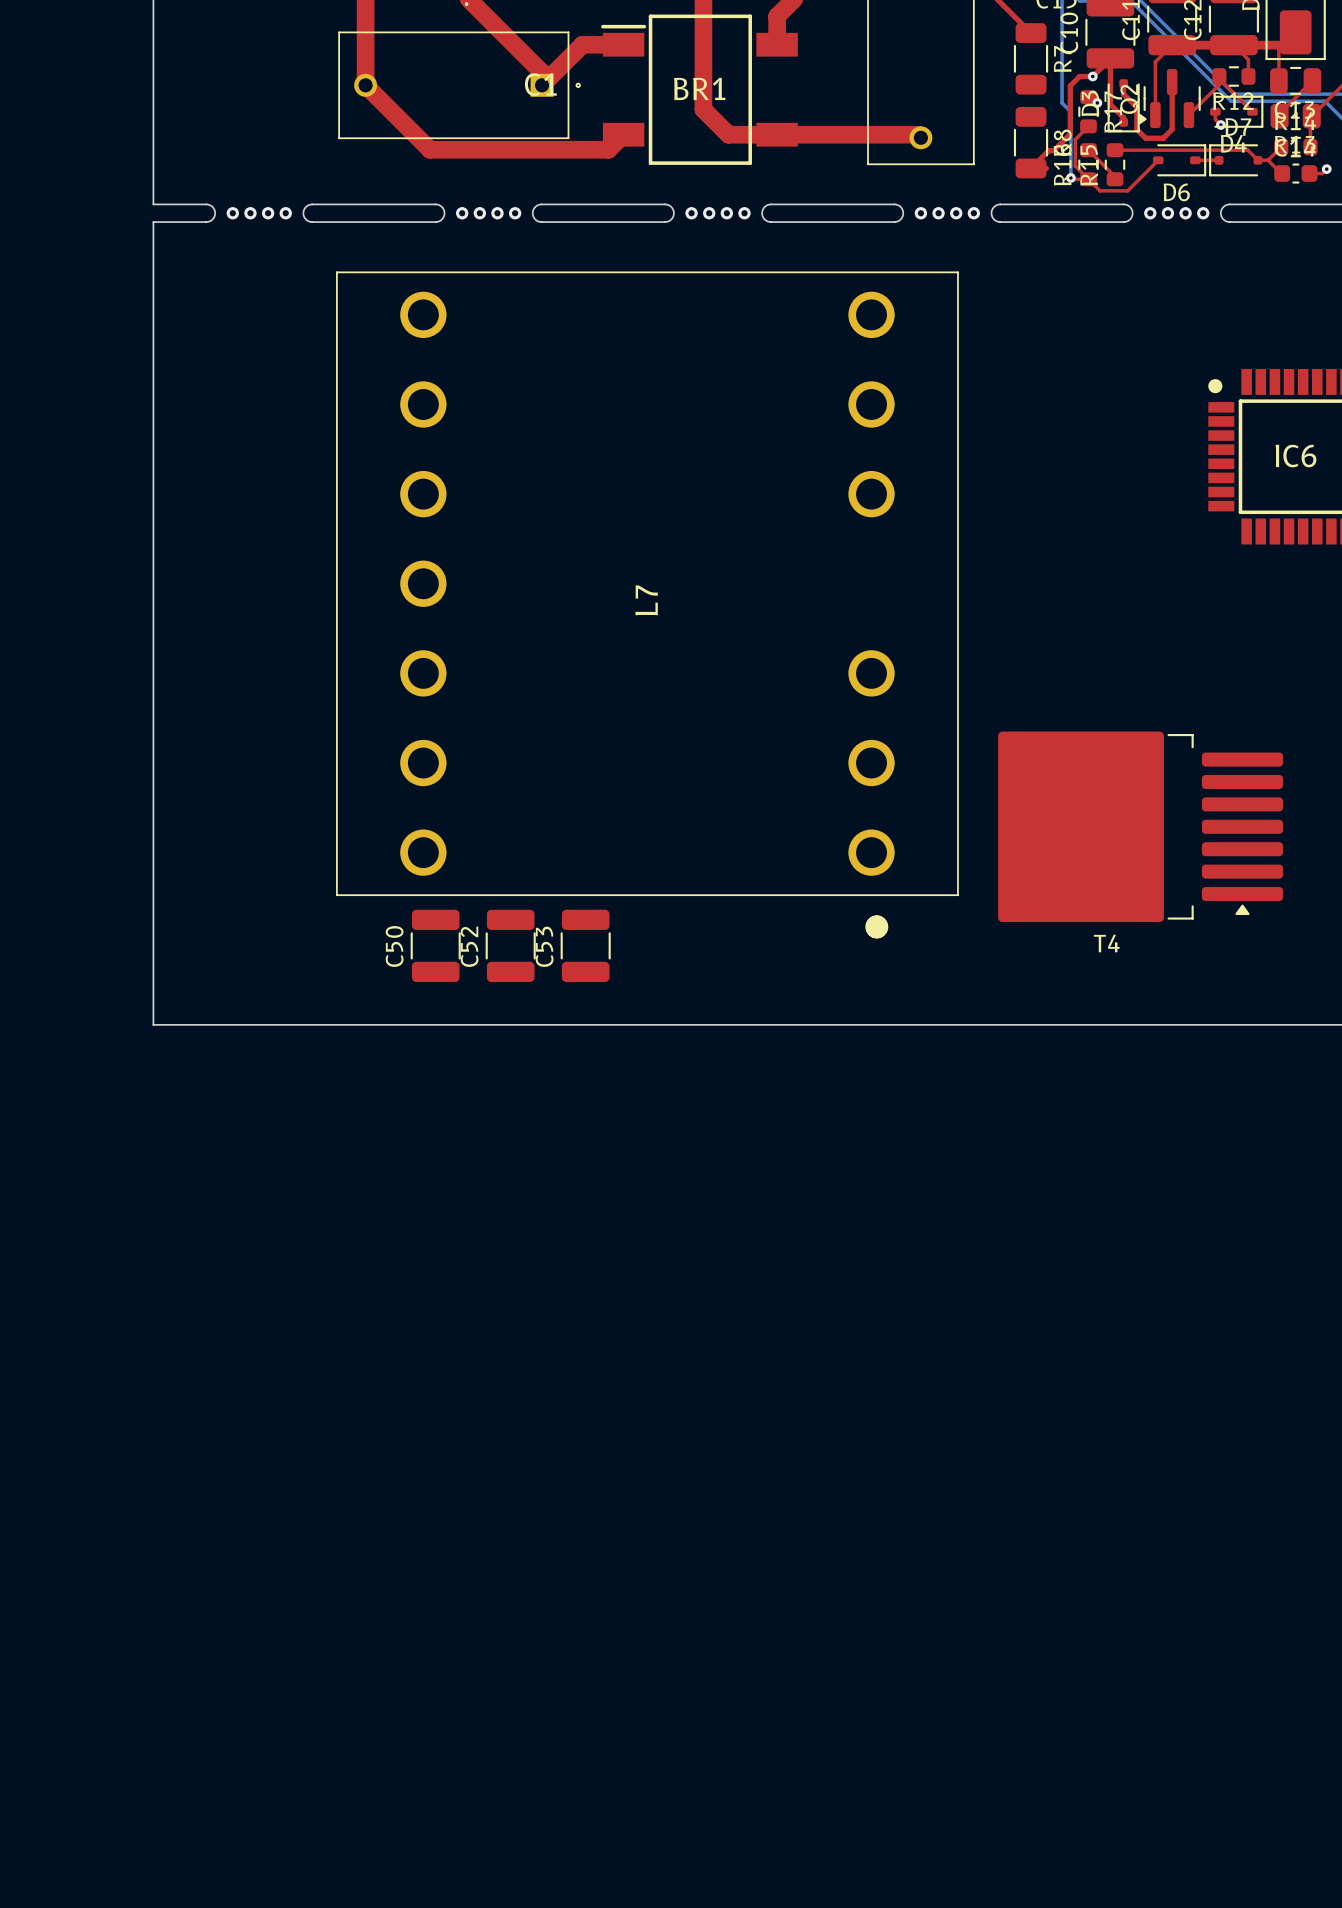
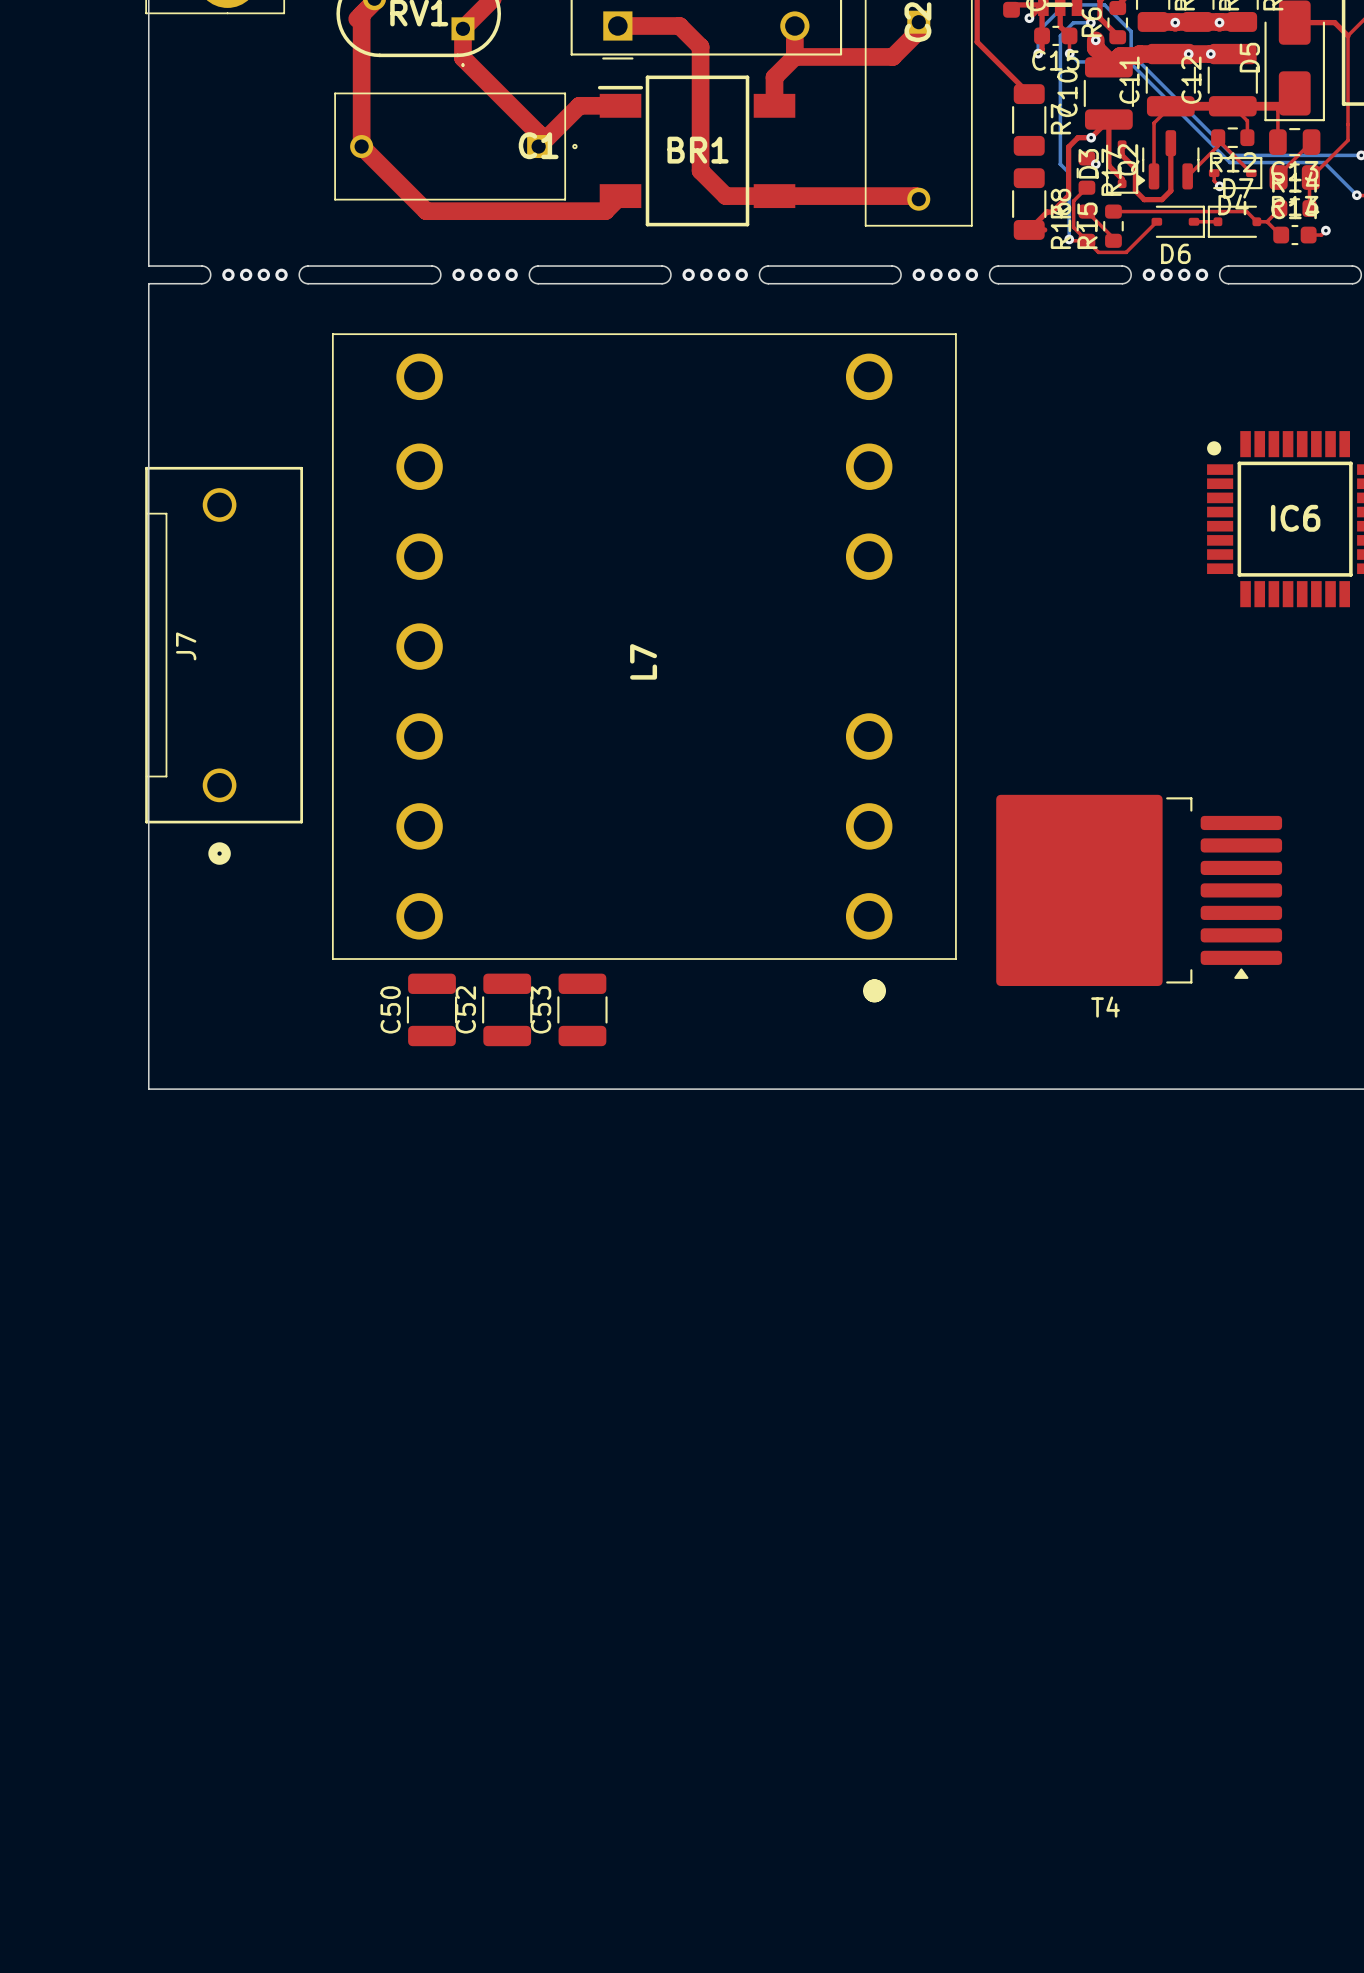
J7: none -> (224, 665)

